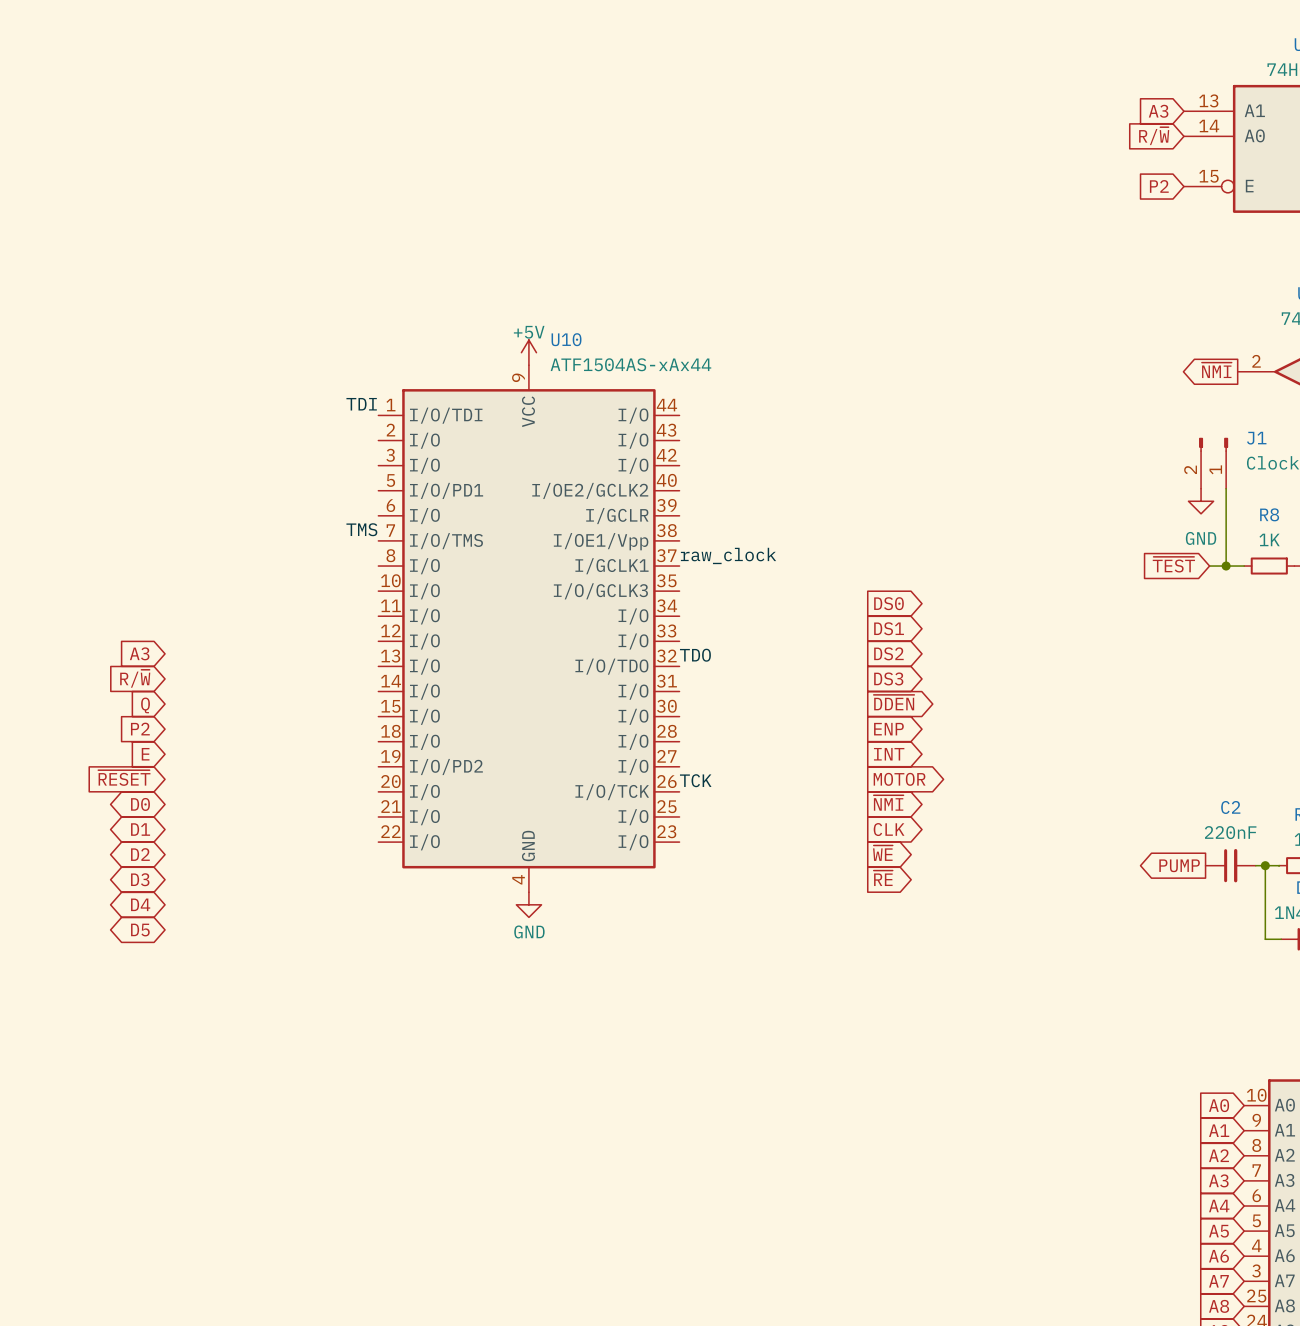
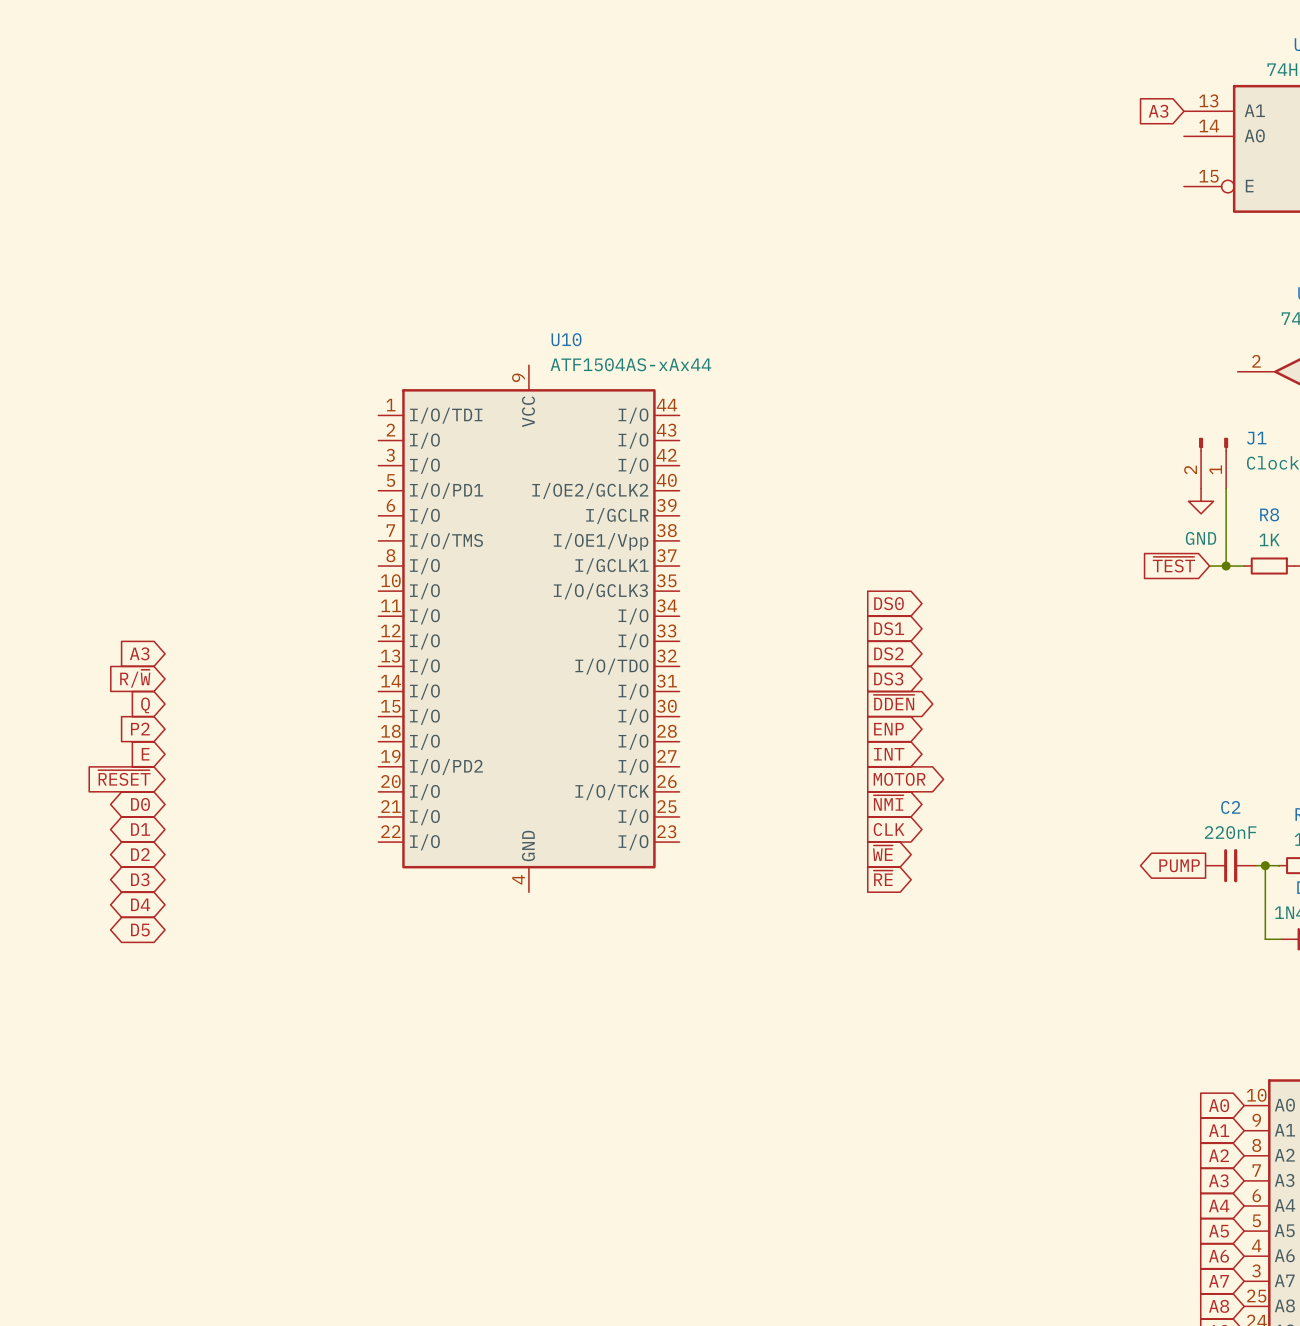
global label: R/~{W} (1154, 136) -> none
global label: P2 (1159, 186) -> none
power symbol: +5V (528, 352) -> none
global label: ~{NMI} (1216, 370) -> none
label: TDI (361, 404) -> none
label: TMS (361, 529) -> none
label: raw_clock (728, 555) -> none
label: TDO (695, 655) -> none
label: TCK (695, 780) -> none
power symbol: GND (528, 904) -> none

